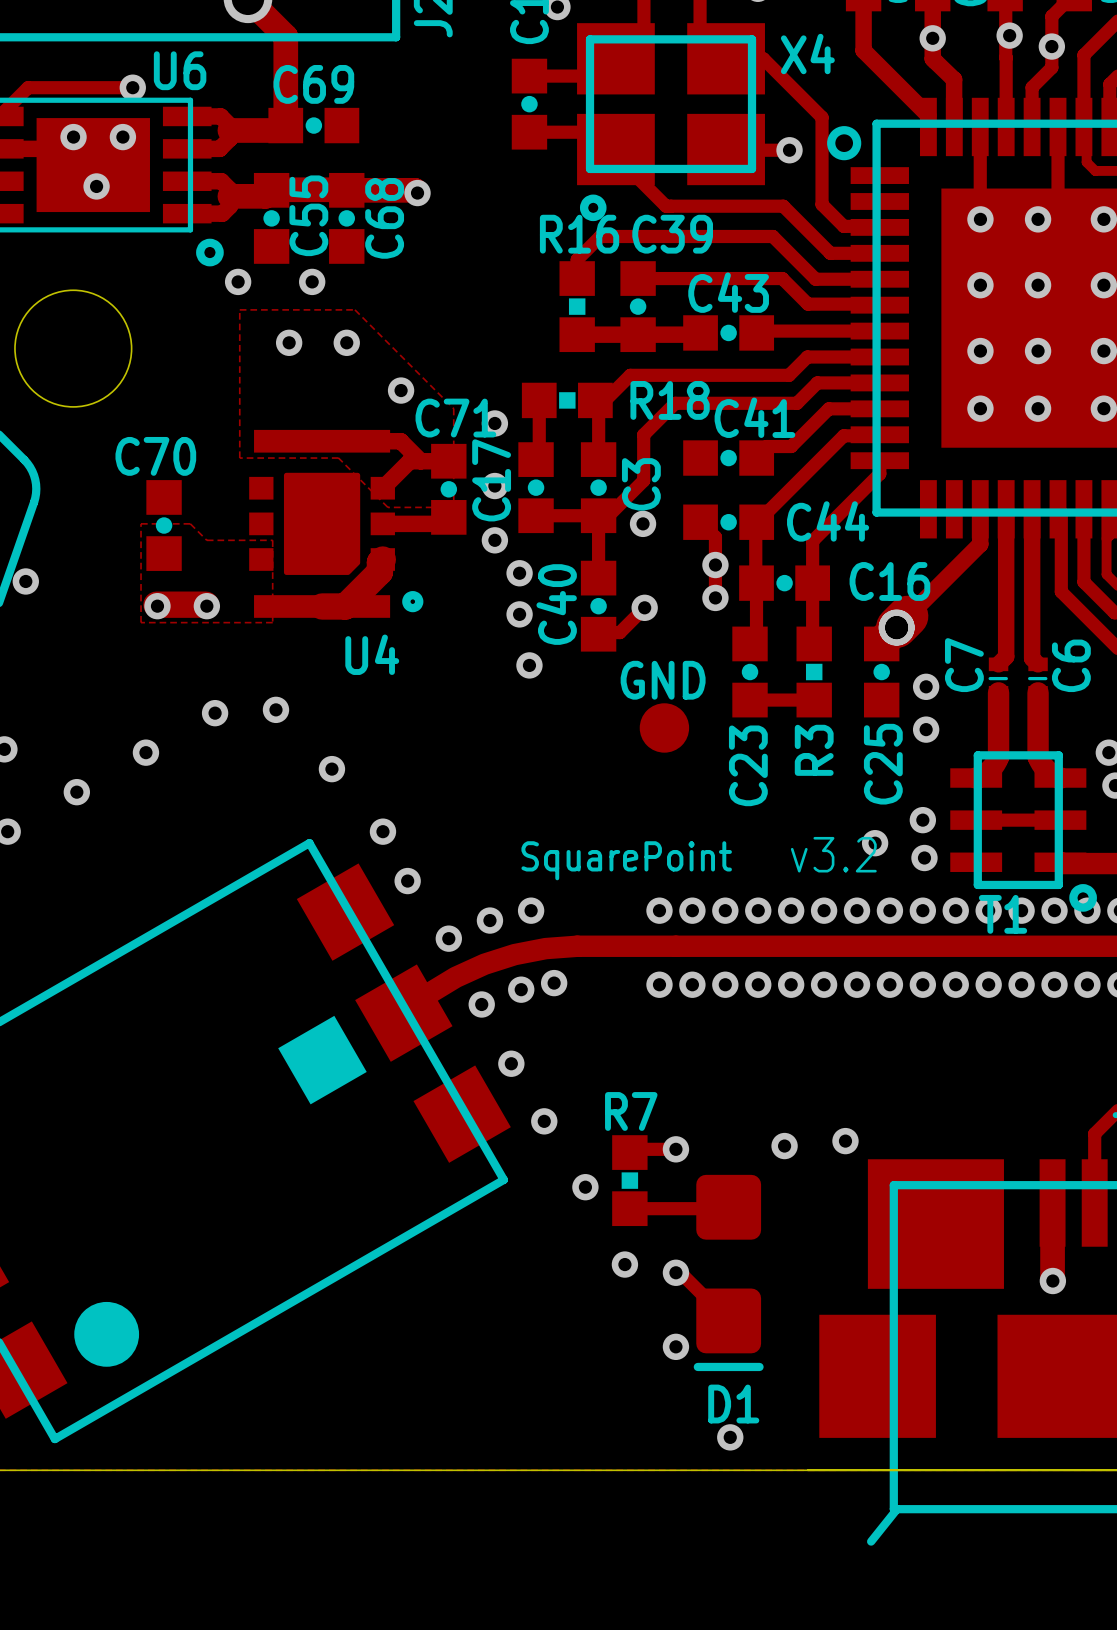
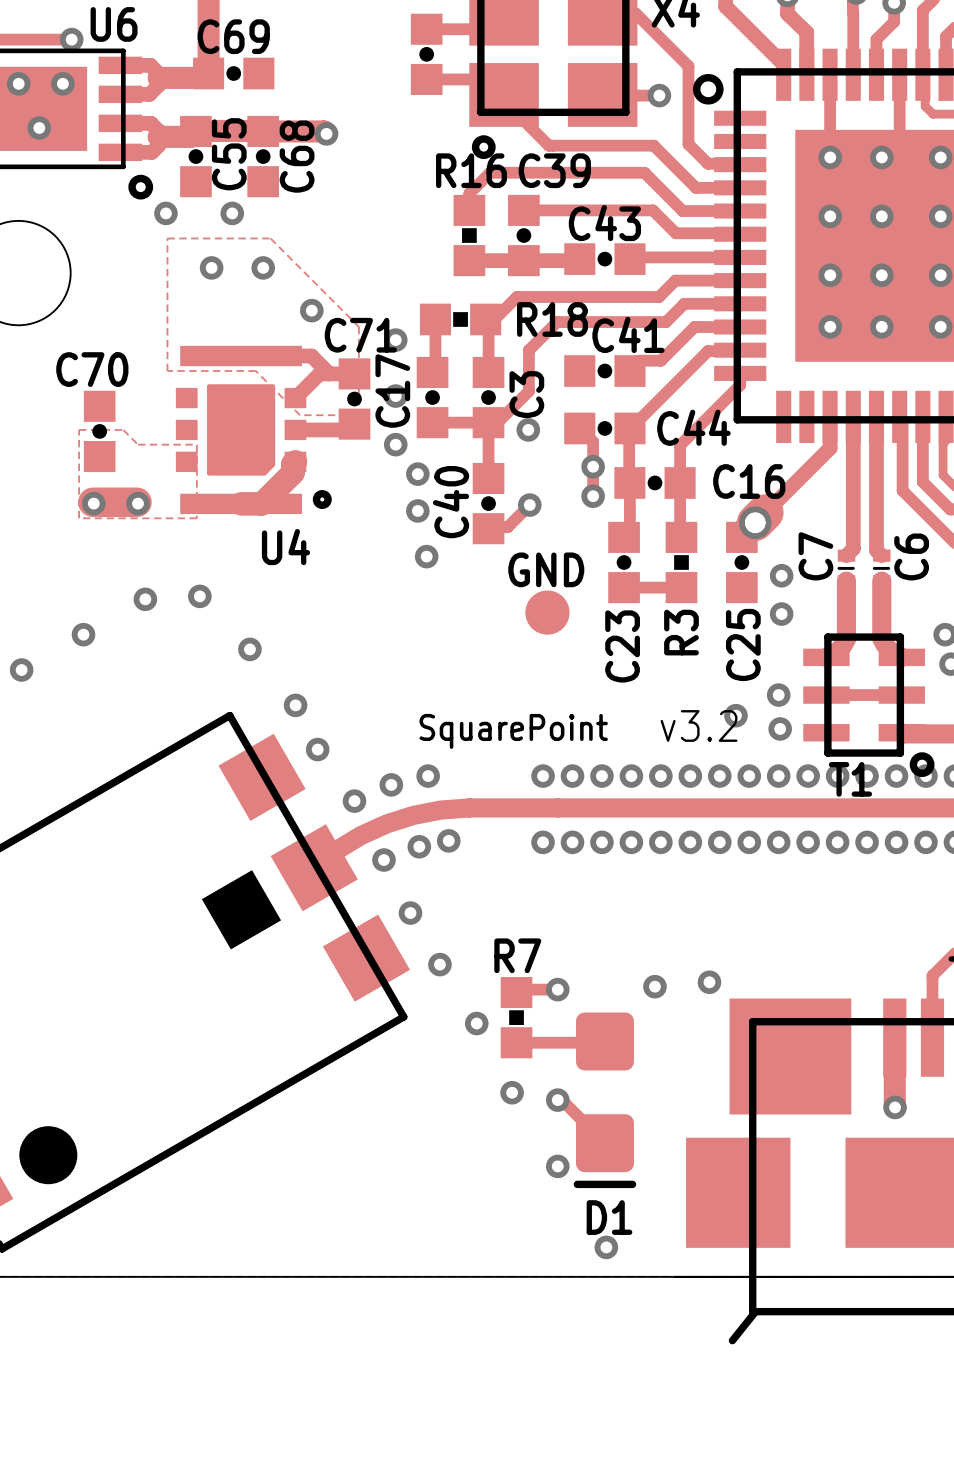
track width: thin (156, 604) (205, 604) -> thick (92, 502) (137, 502)

